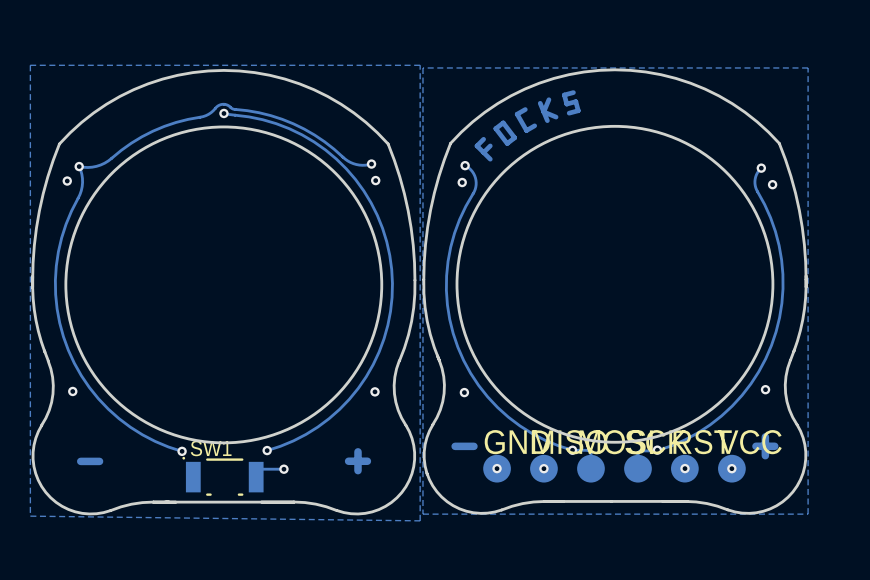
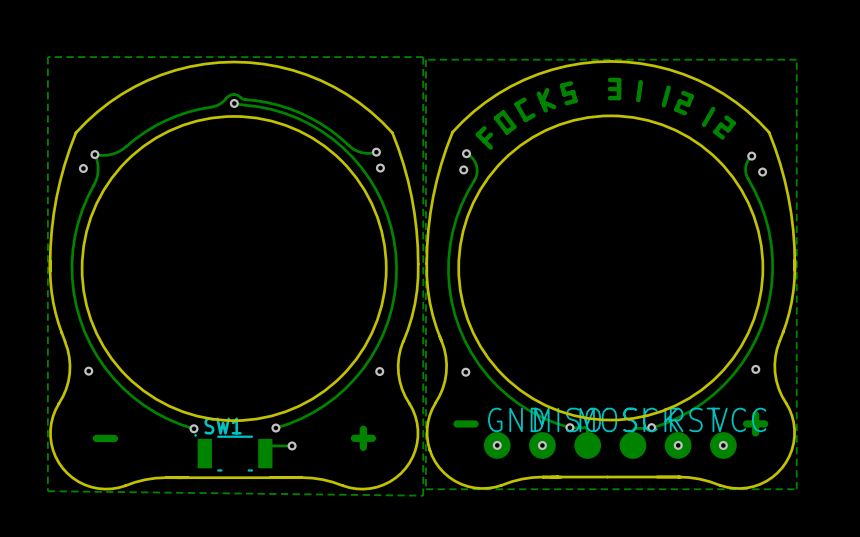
track: none -> (610, 80) (619, 80) (619, 98) (610, 98)
track: none -> (640, 82) (638, 100)
track: none -> (668, 87) (663, 105)
track: none -> (619, 89) (610, 89)
track: none -> (683, 92) (691, 96) (688, 104) (679, 101) (676, 109) (684, 113)
track: none -> (713, 109) (704, 124)
track: none -> (726, 117) (733, 123) (728, 130) (720, 124) (715, 131) (722, 137)

